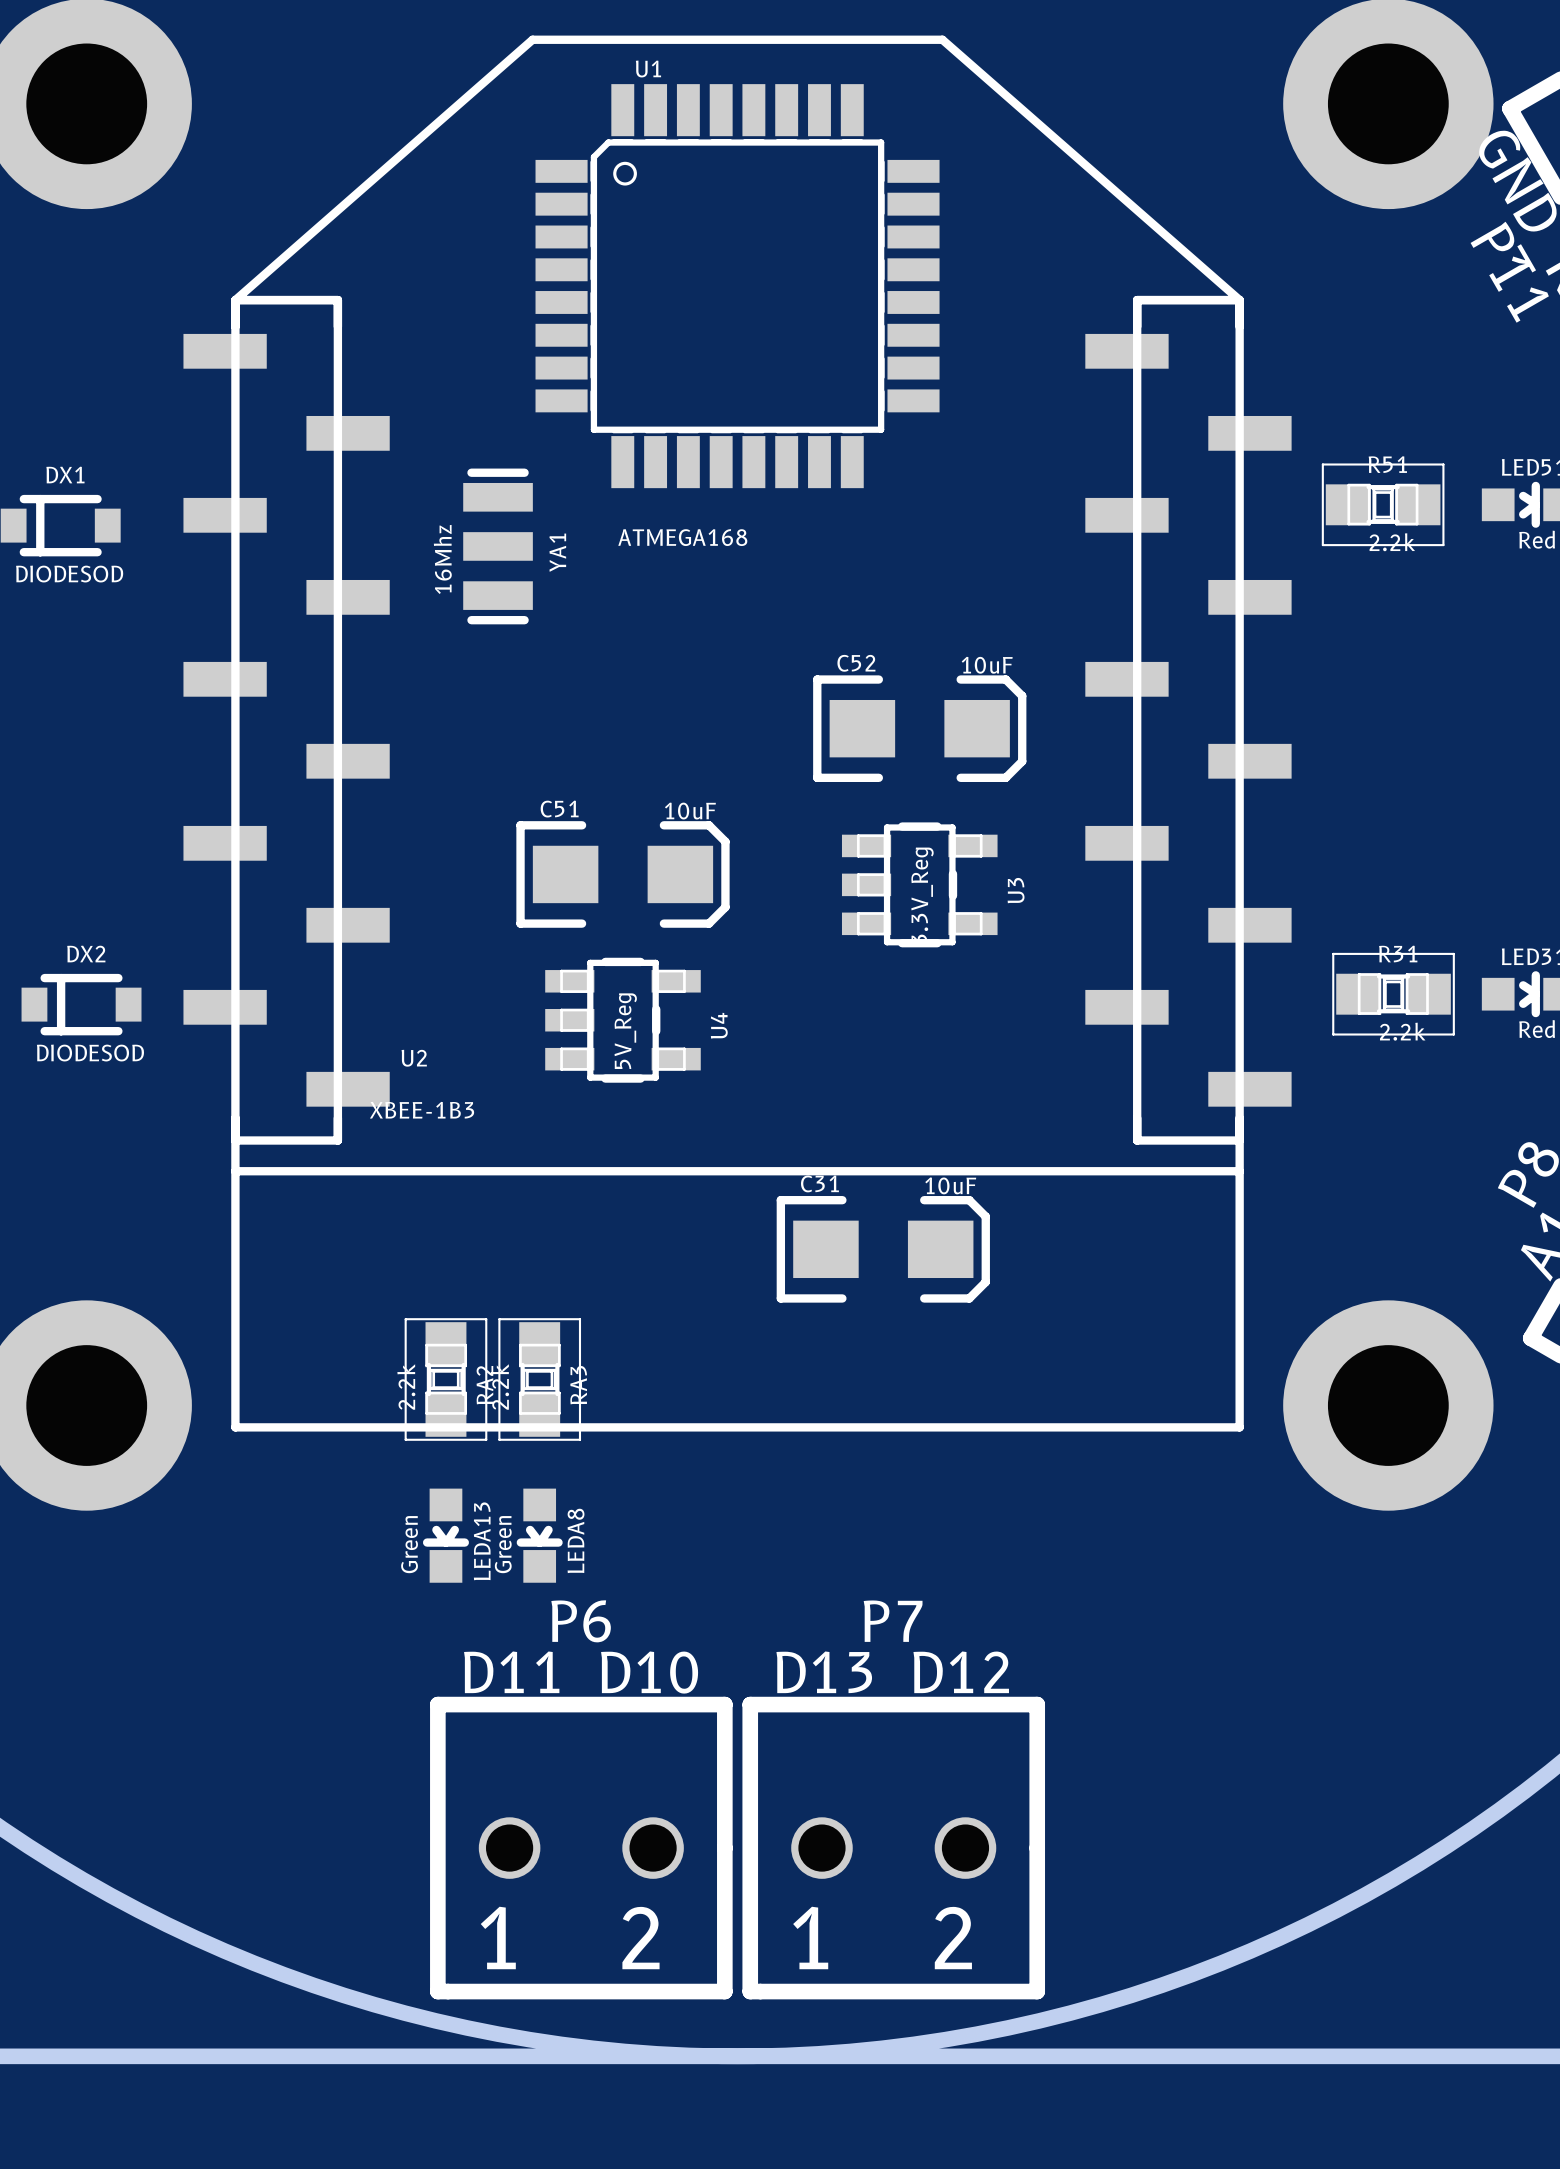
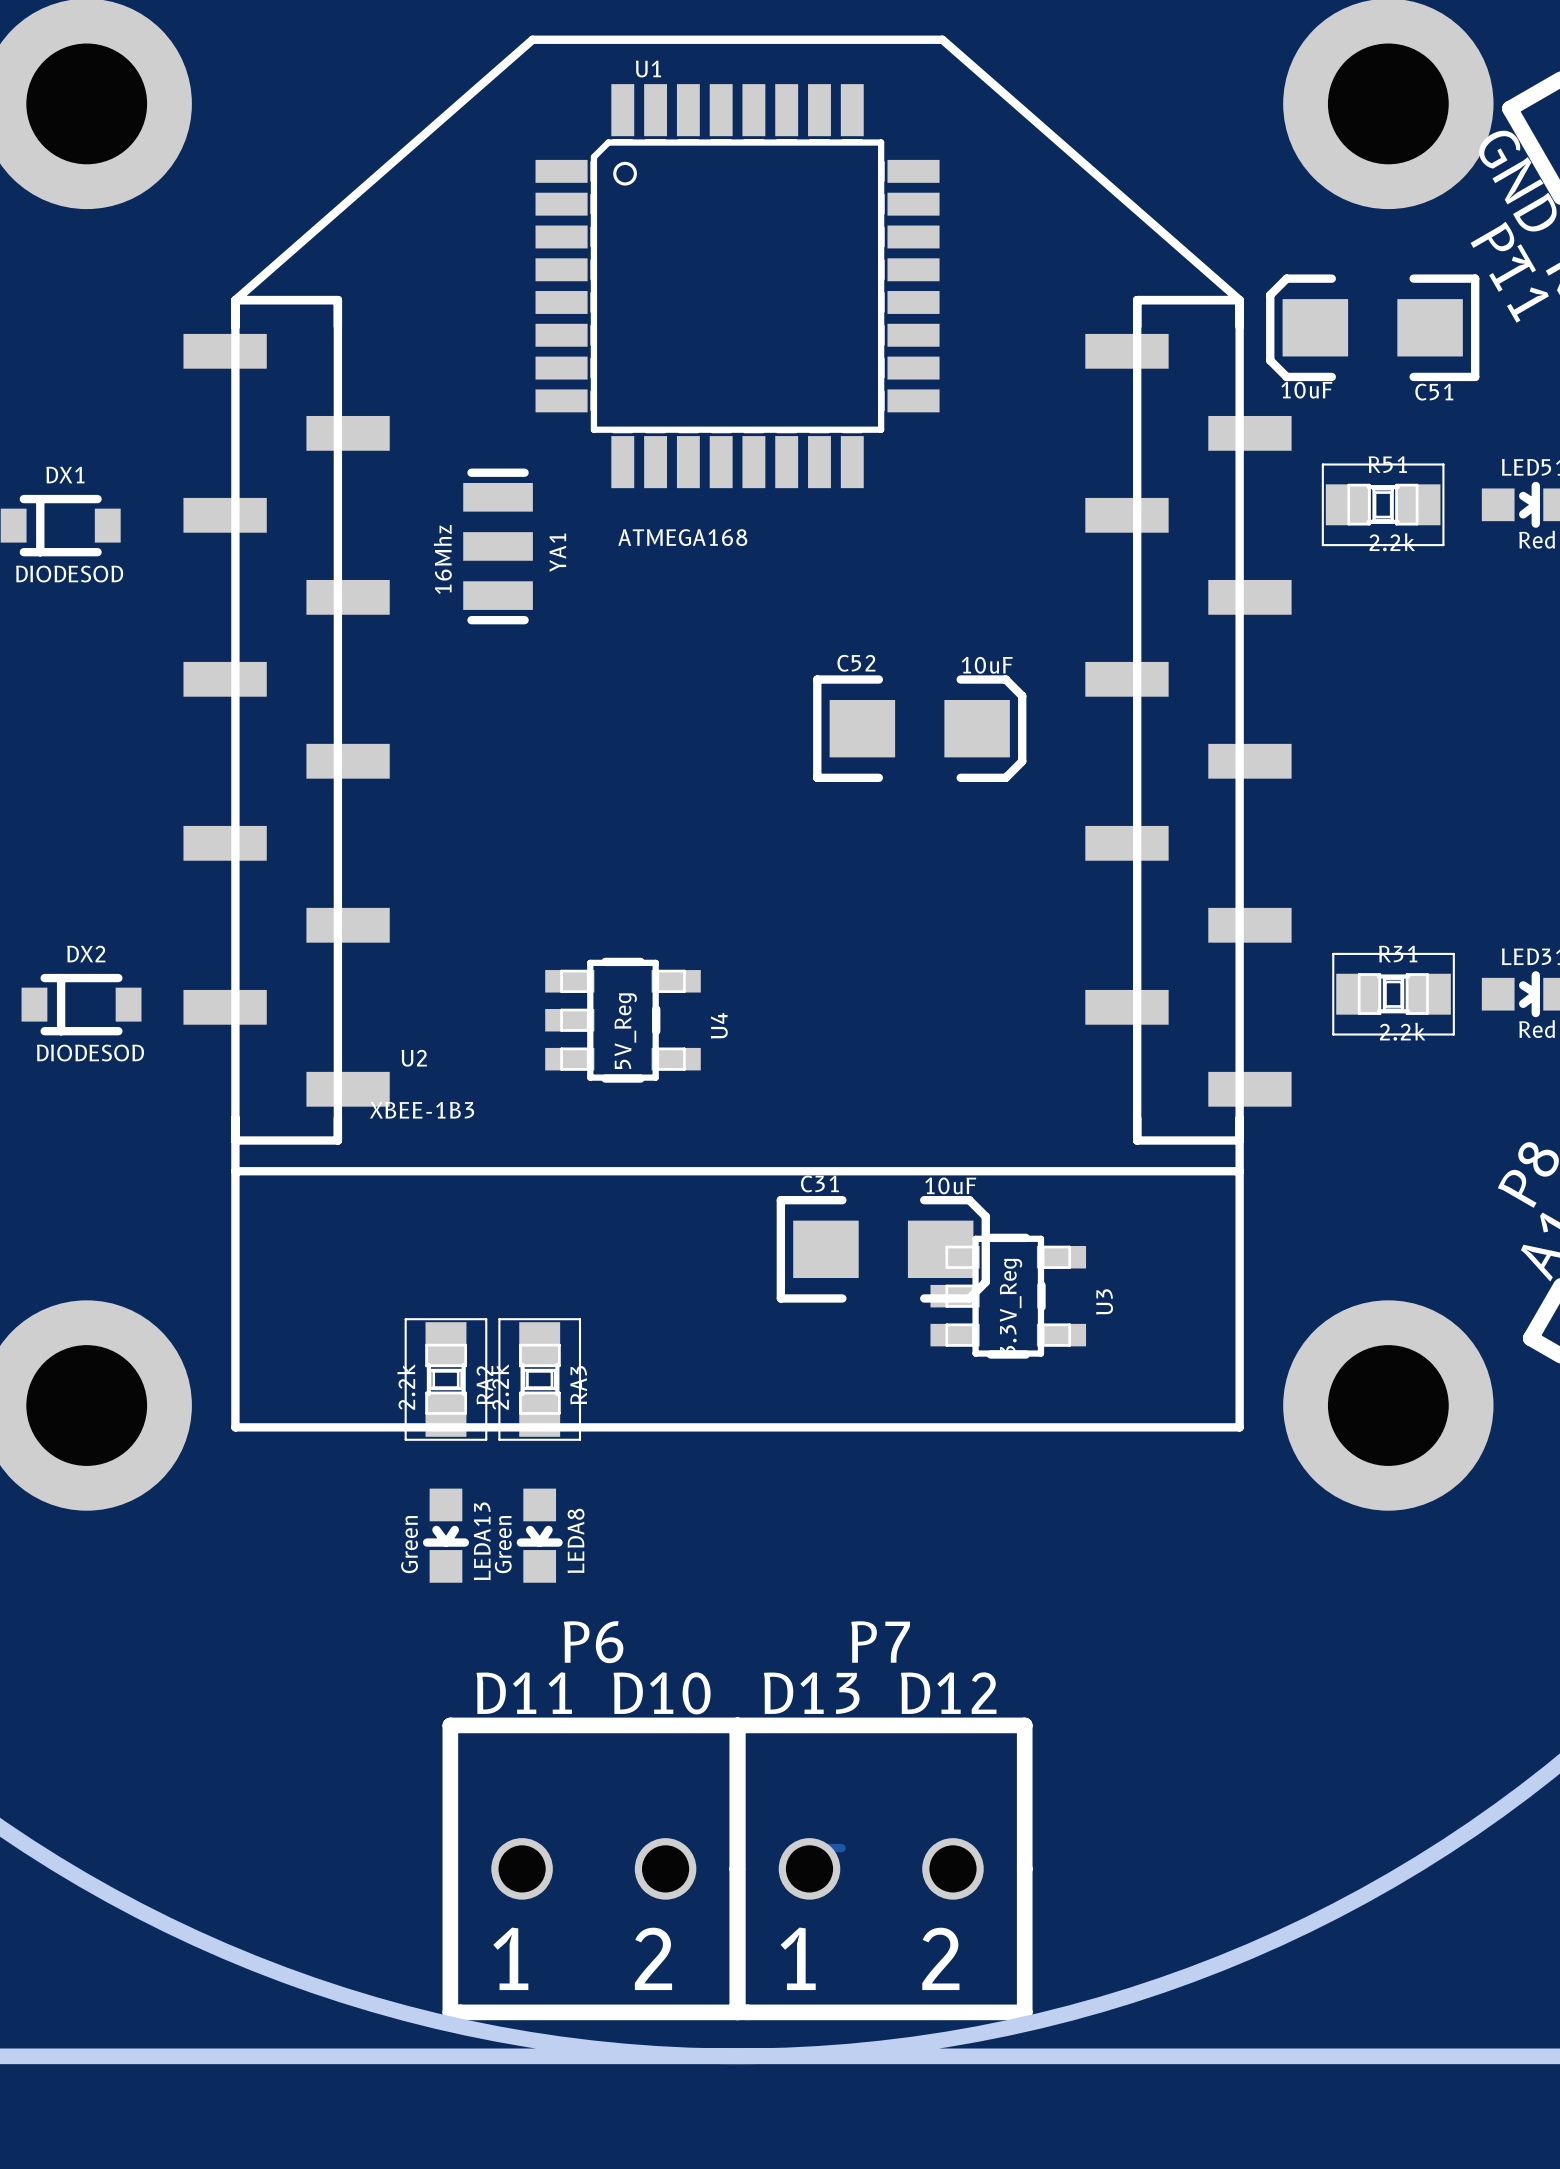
C51 rotation: 0° (622, 874) -> 180° (1372, 327)
C51 position: (622, 874) -> (1372, 327)
U3 position: (919, 884) -> (1008, 1296)
P6 position: (581, 1848) -> (593, 1868)
P7 position: (893, 1848) -> (881, 1868)

